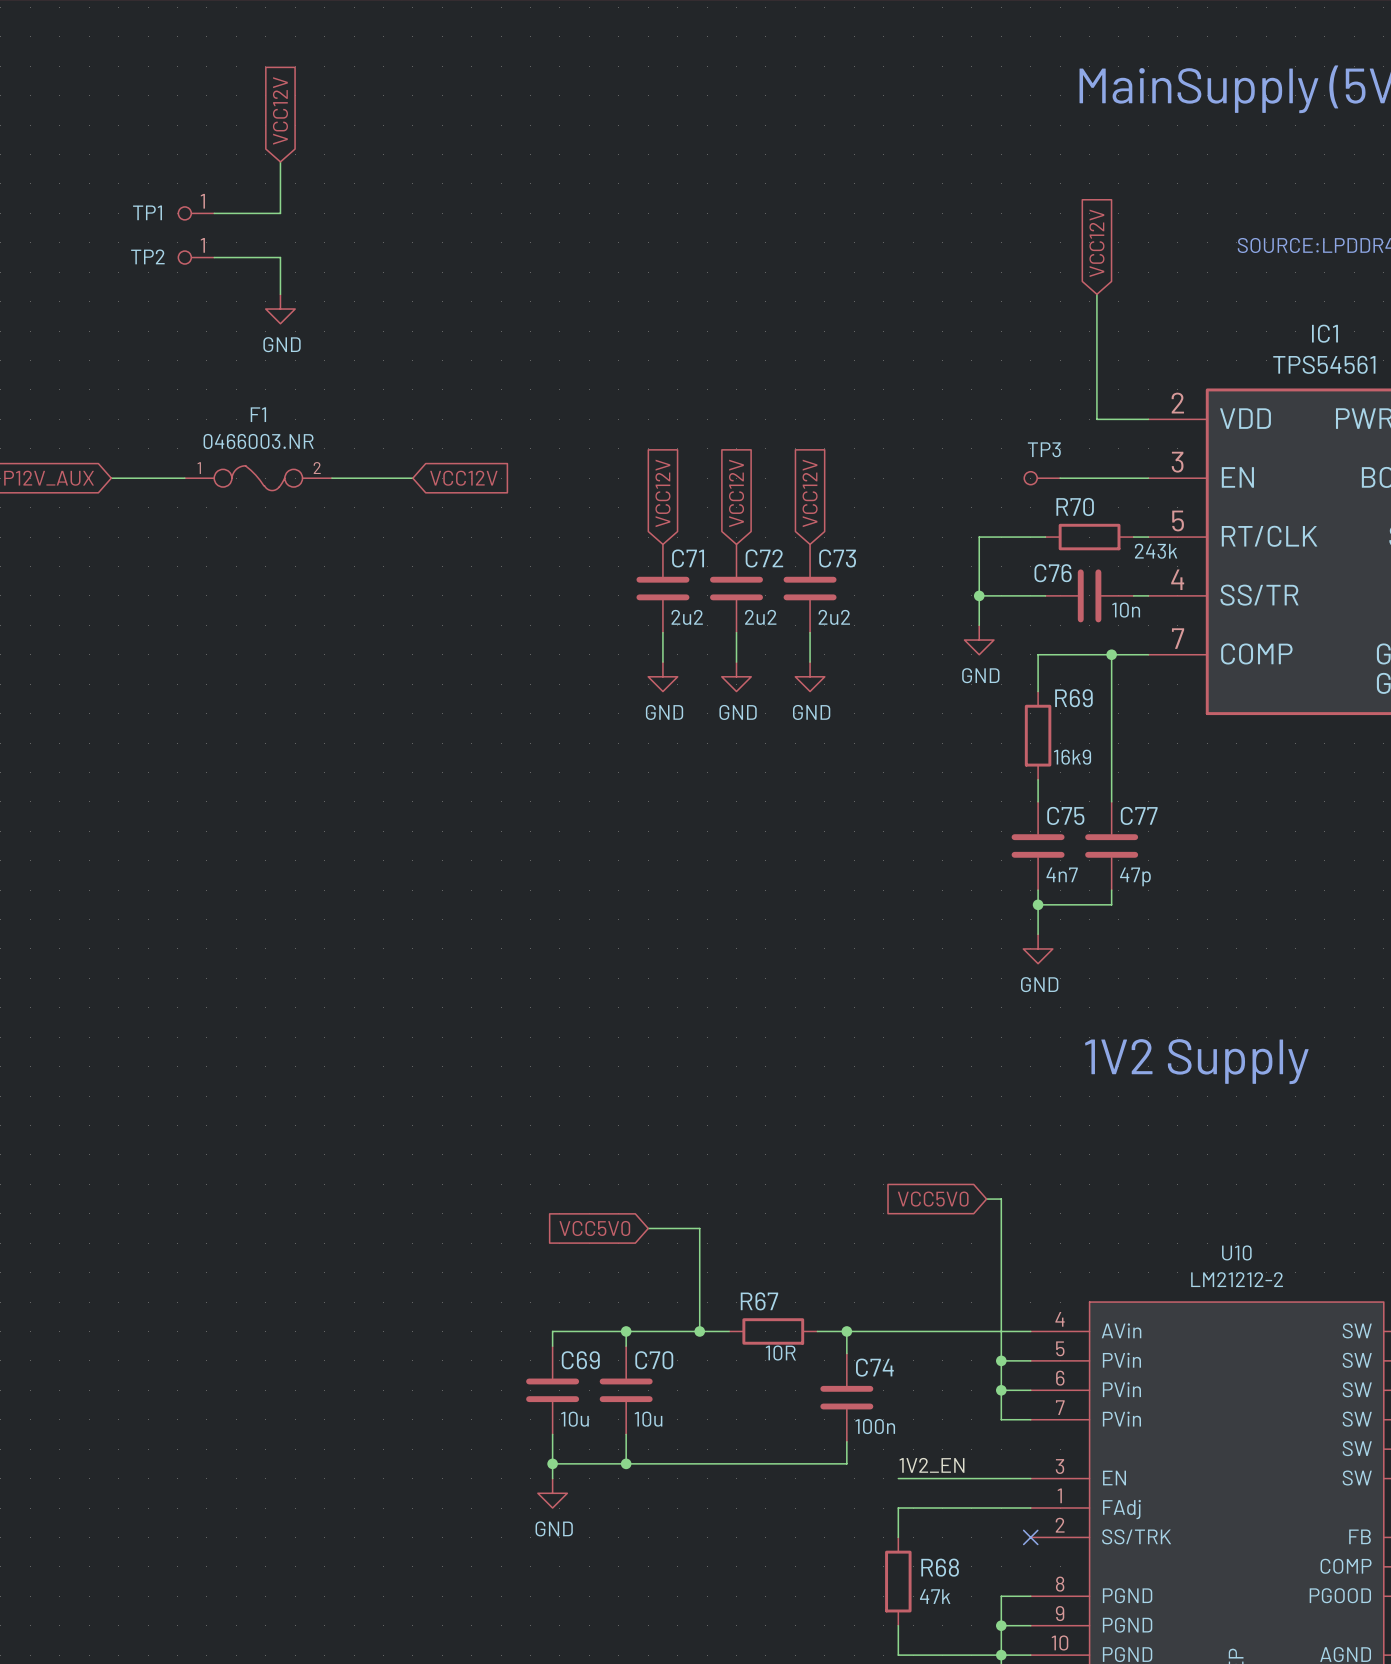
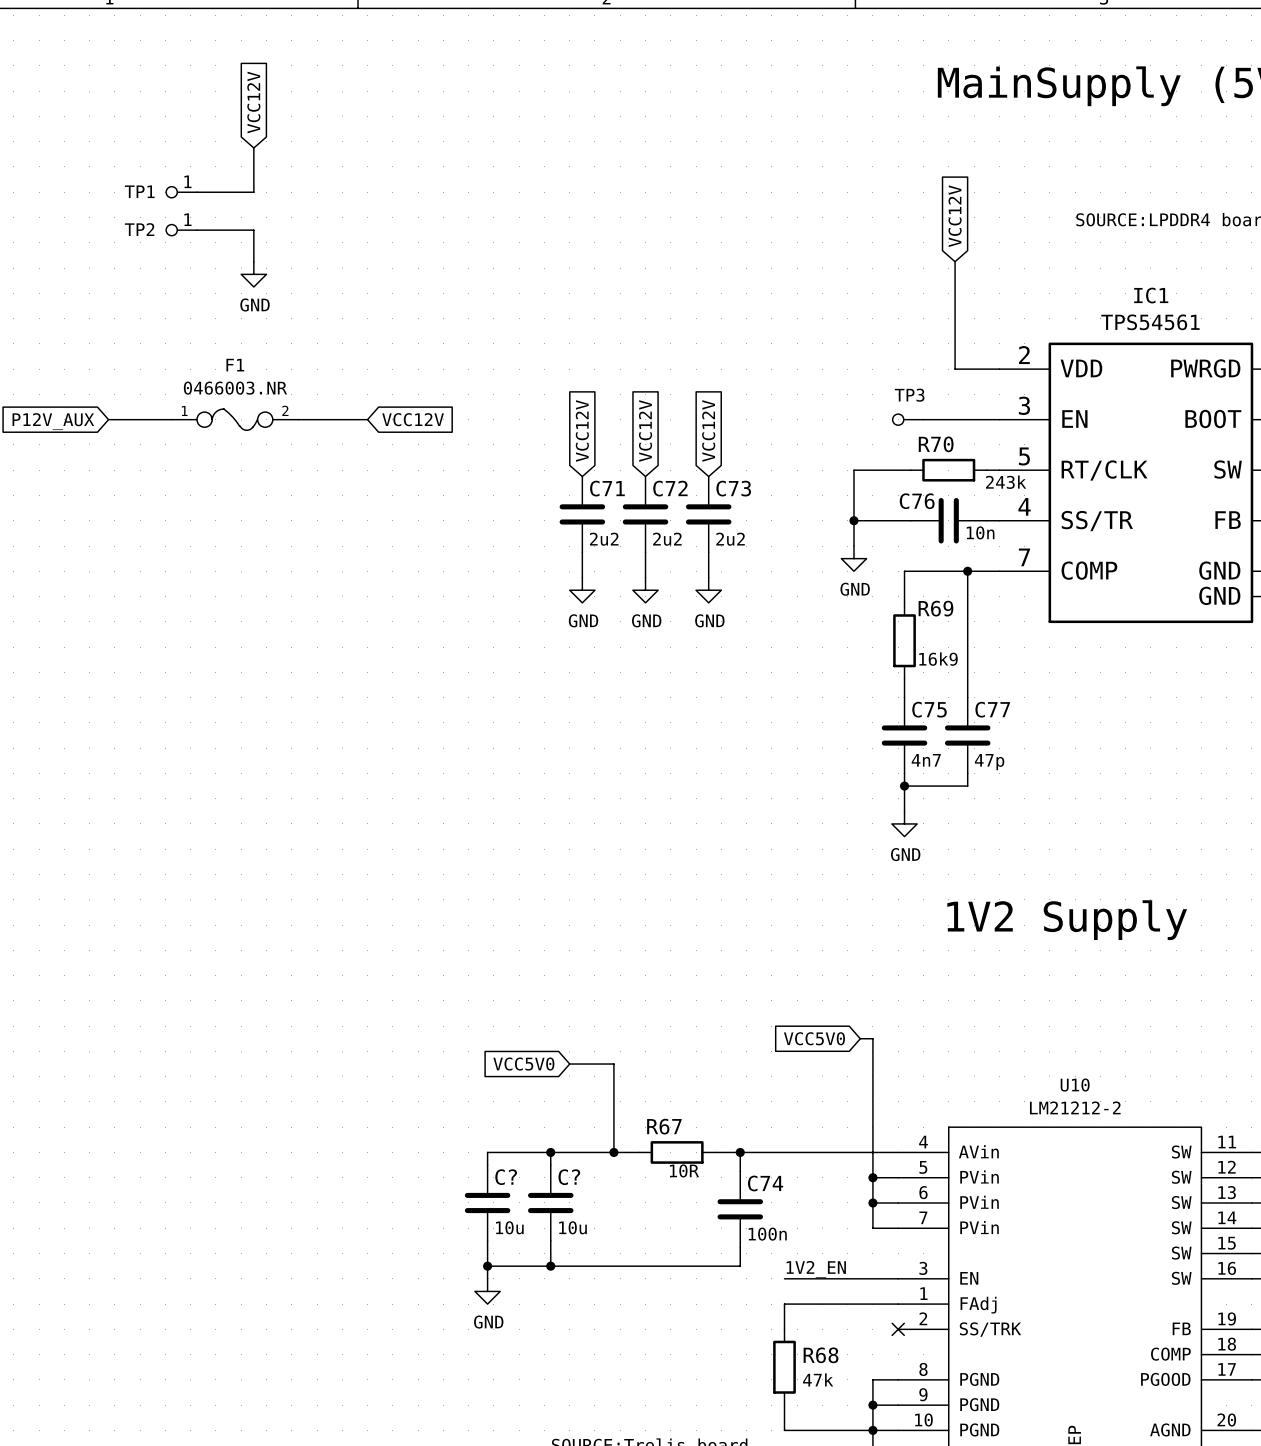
C69 name: C69 (580, 1360) -> C? (506, 1177)
C70 name: C70 (654, 1360) -> C? (569, 1177)

